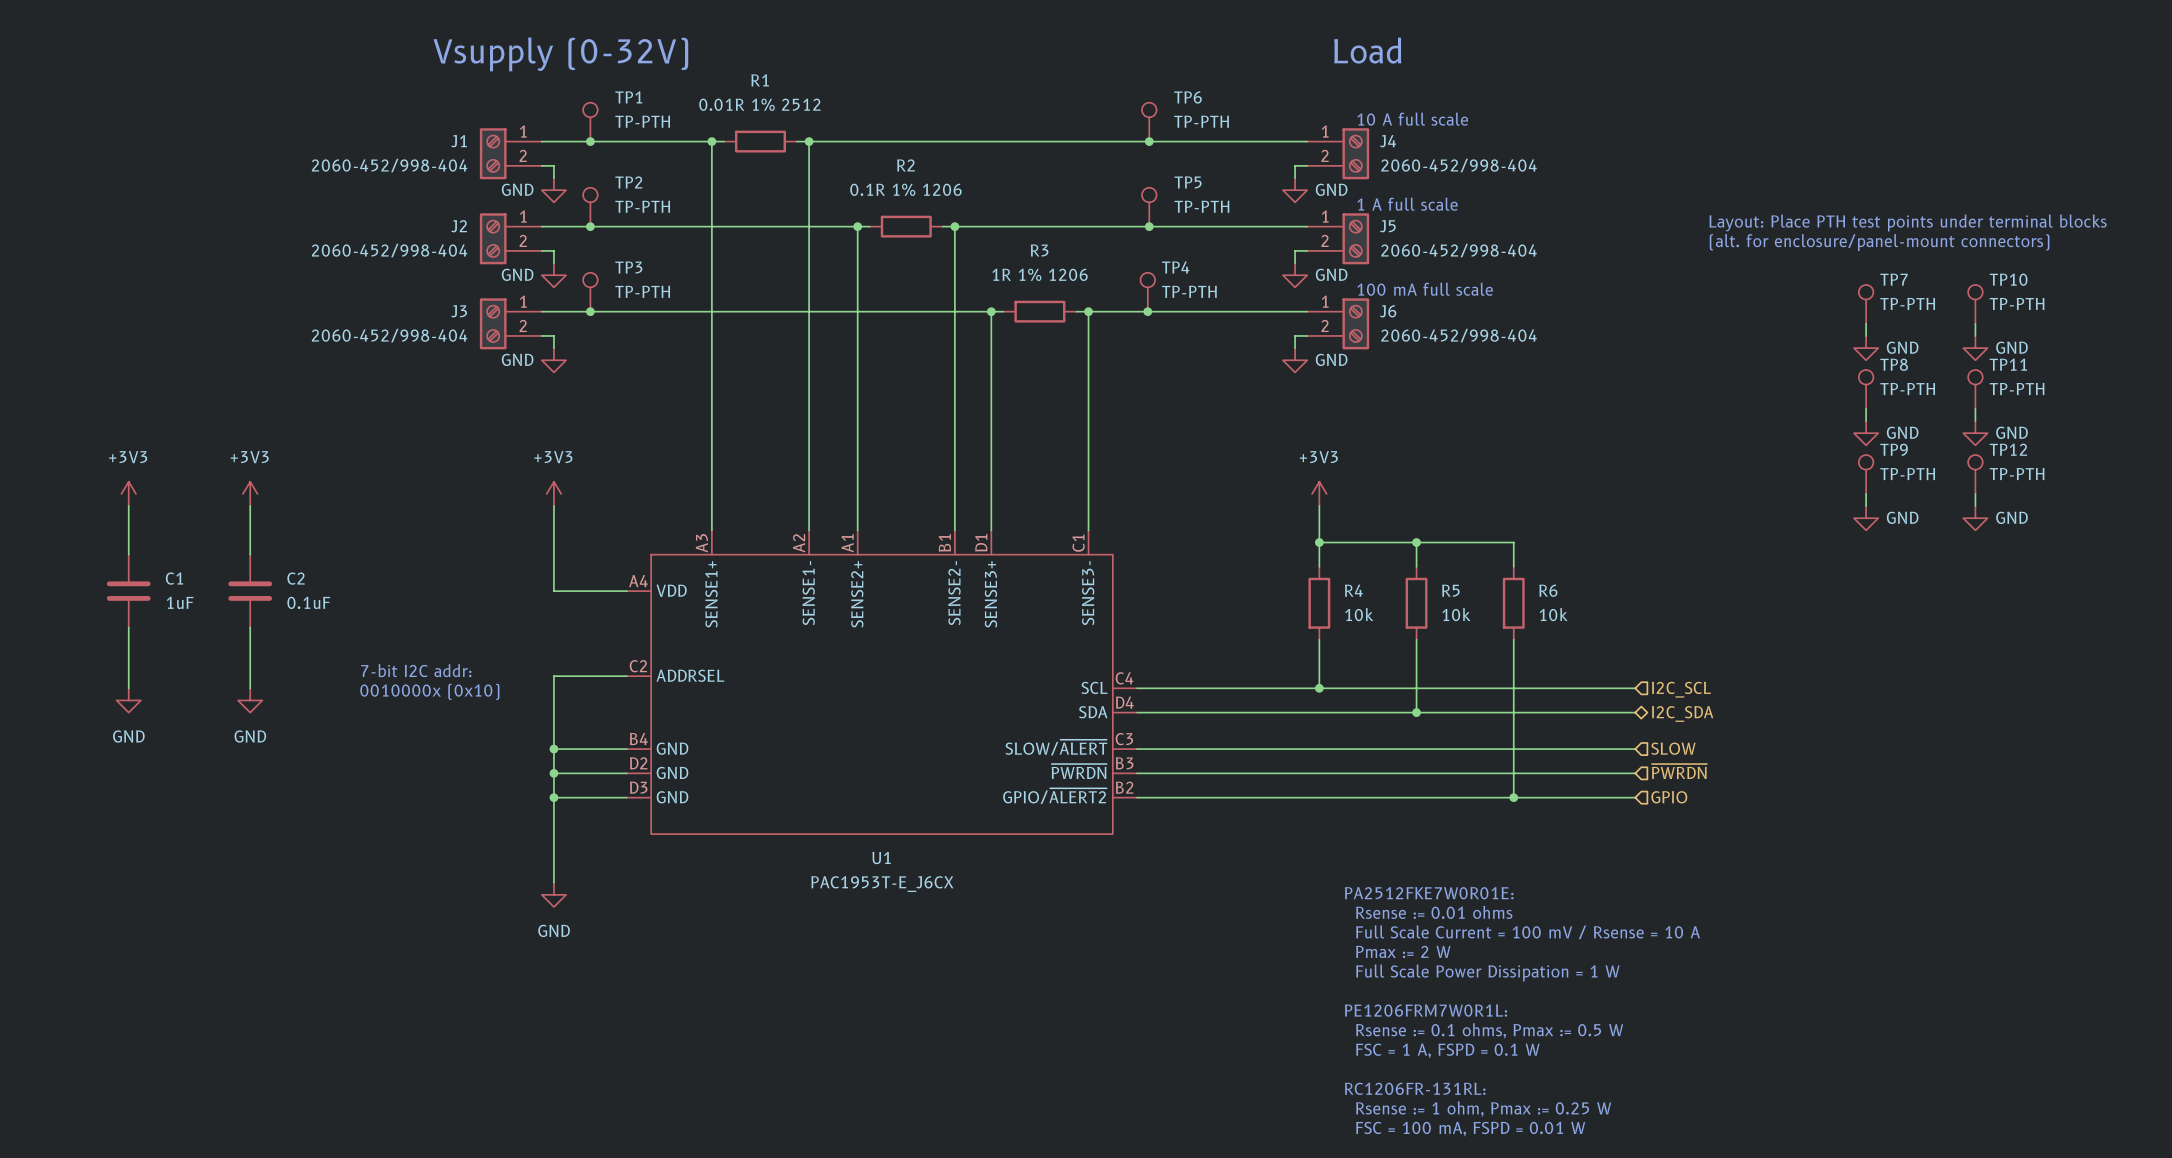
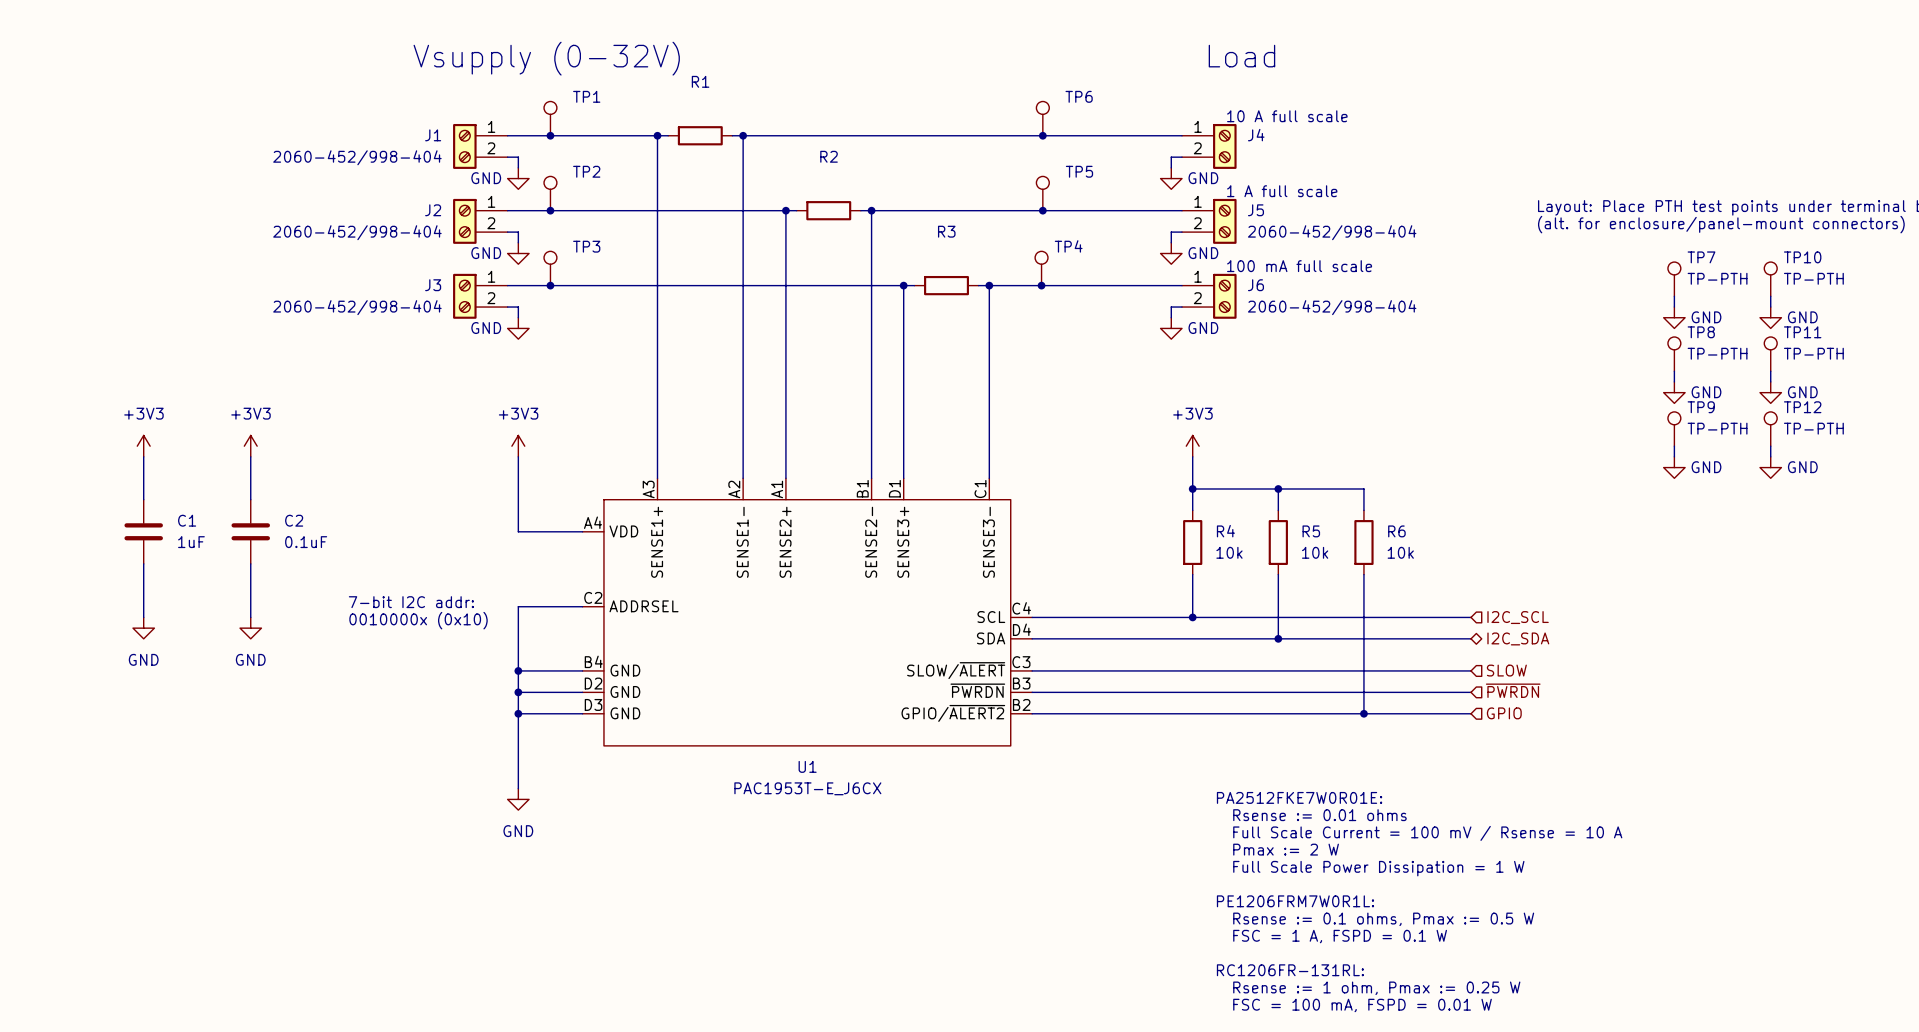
R1 value: 0.01R 1% 2512 (759, 104) -> none
TP1 value: TP-PTH (642, 121) -> none
TP6 value: TP-PTH (1201, 121) -> none
J4 value: 2060-452/998-404 (1459, 165) -> none
R2 value: 0.1R 1% 1206 (905, 189) -> none
TP2 value: TP-PTH (642, 206) -> none
TP5 value: TP-PTH (1201, 206) -> none
R3 value: 1R 1% 1206 (1040, 274) -> none
TP3 value: TP-PTH (642, 291) -> none
TP4 value: TP-PTH (1189, 291) -> none

